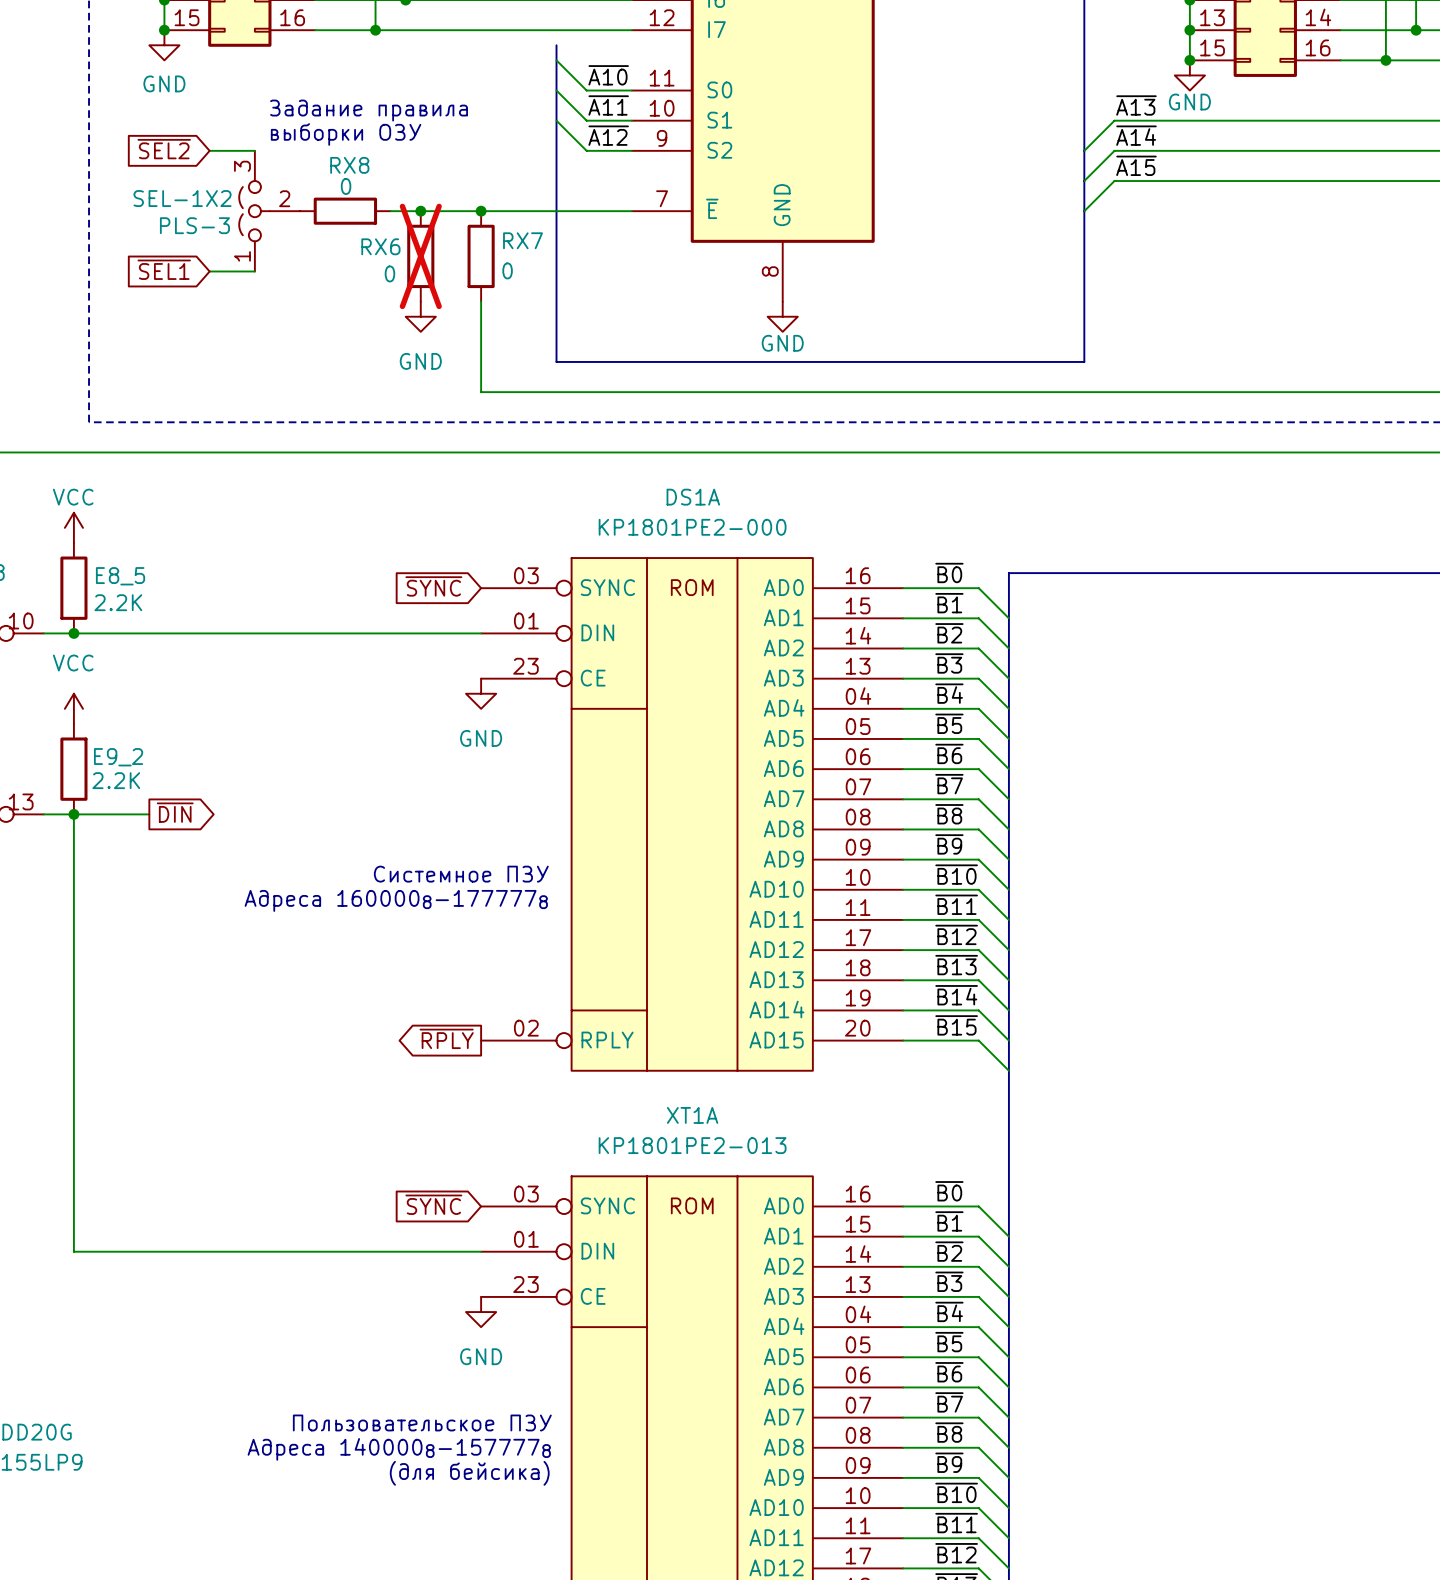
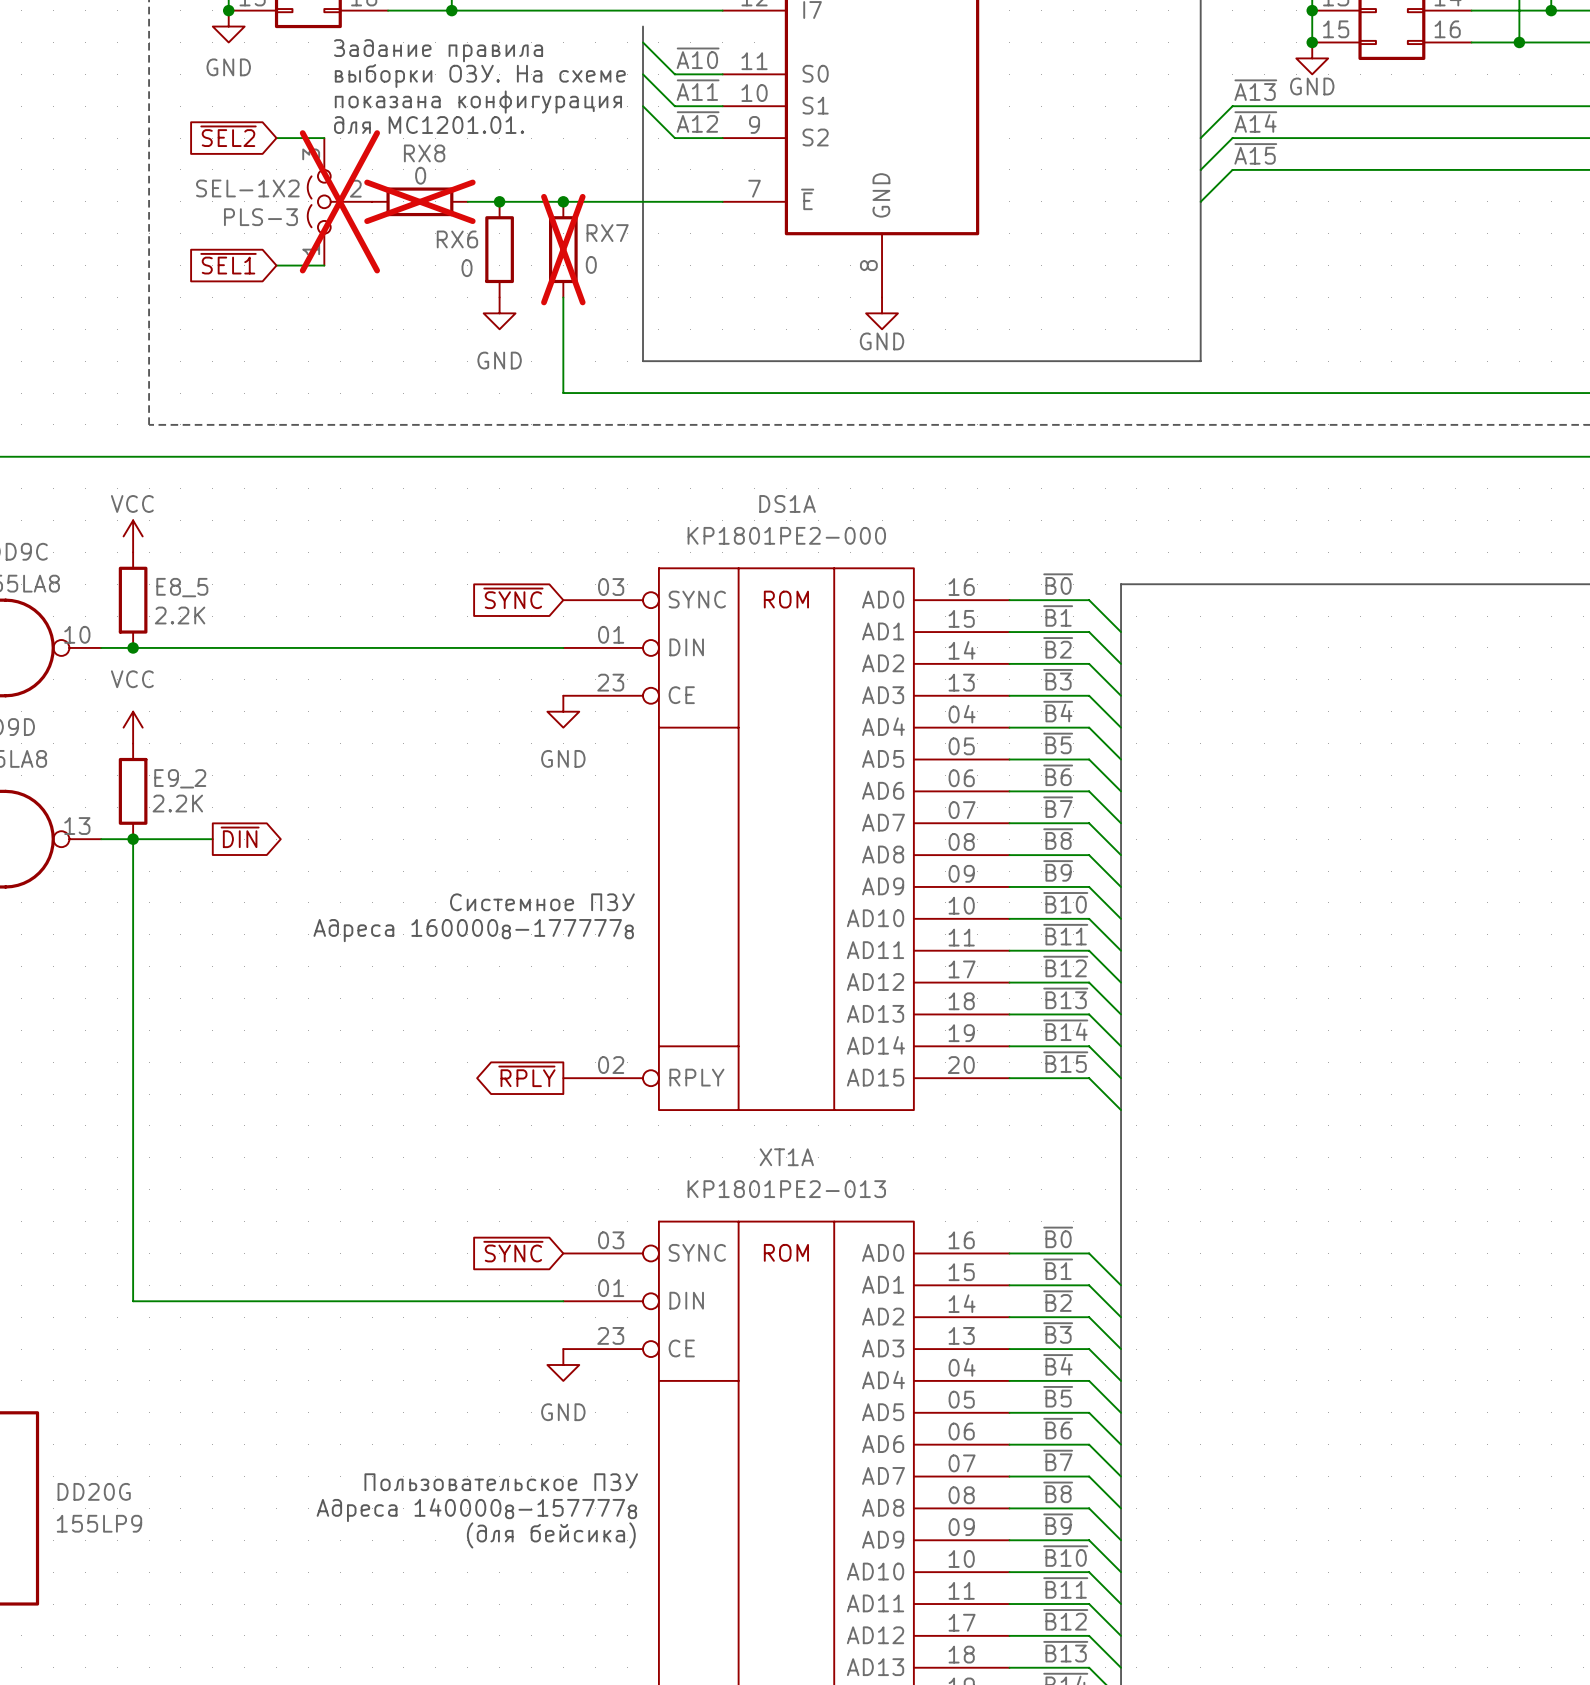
text: none -> выборки ОЗУ. На схеме (480, 75)
text position: Задание правила (369, 110) -> Задание правила (438, 50)
text: none -> показана конфигурация (478, 102)
text: выборки ОЗУ (346, 134) -> для МС1201.01. (429, 125)
SEL-1X2 do-not-place cross: none -> (339, 201)
RX8 do-not-place cross: none -> (419, 201)
RX6 do-not-place cross: (420, 256) -> none
RX7 do-not-place cross: none -> (563, 249)

